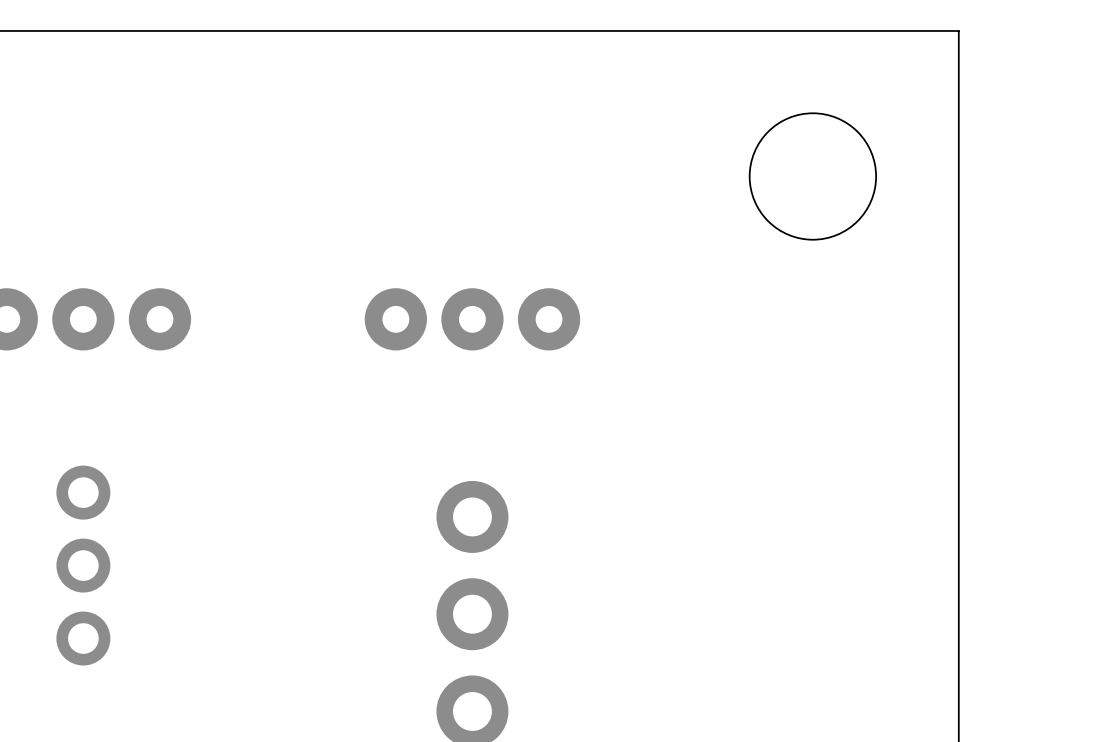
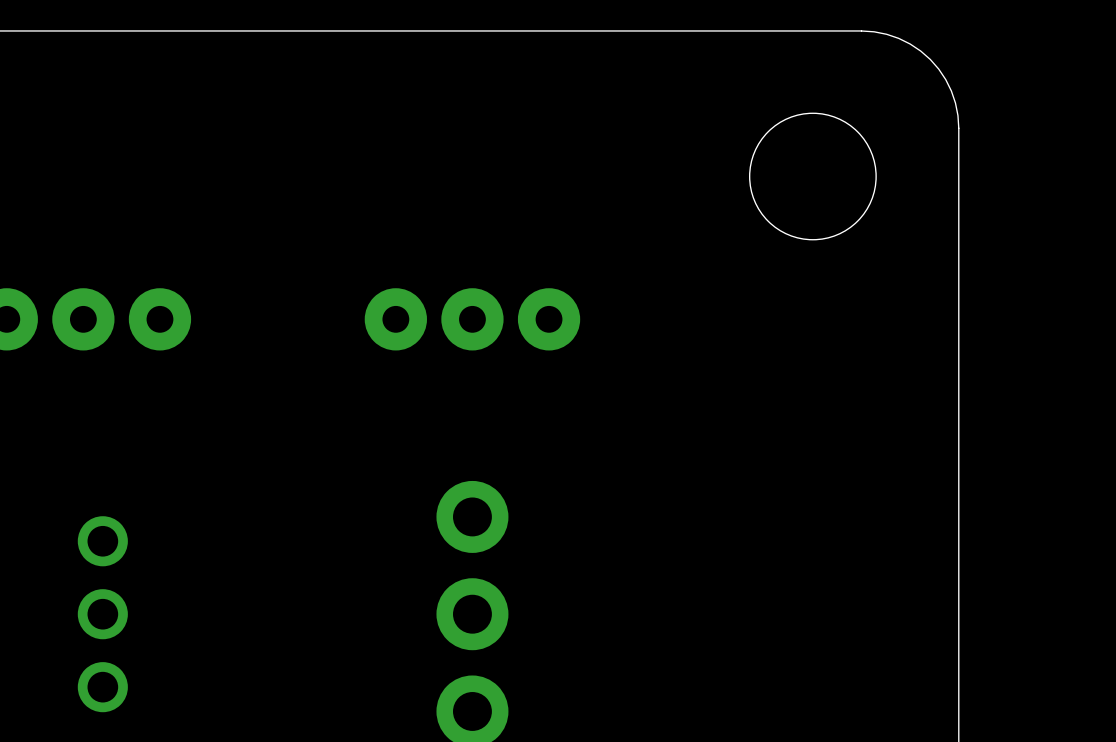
board edge: (861, 30) (958, 30) (958, 128) -> (861, 30) (886, 34) (898, 38) (920, 51) (930, 59) (938, 69) (951, 91) (955, 103) (958, 128)
part: (83, 565) -> none
part: none -> (102, 614)

